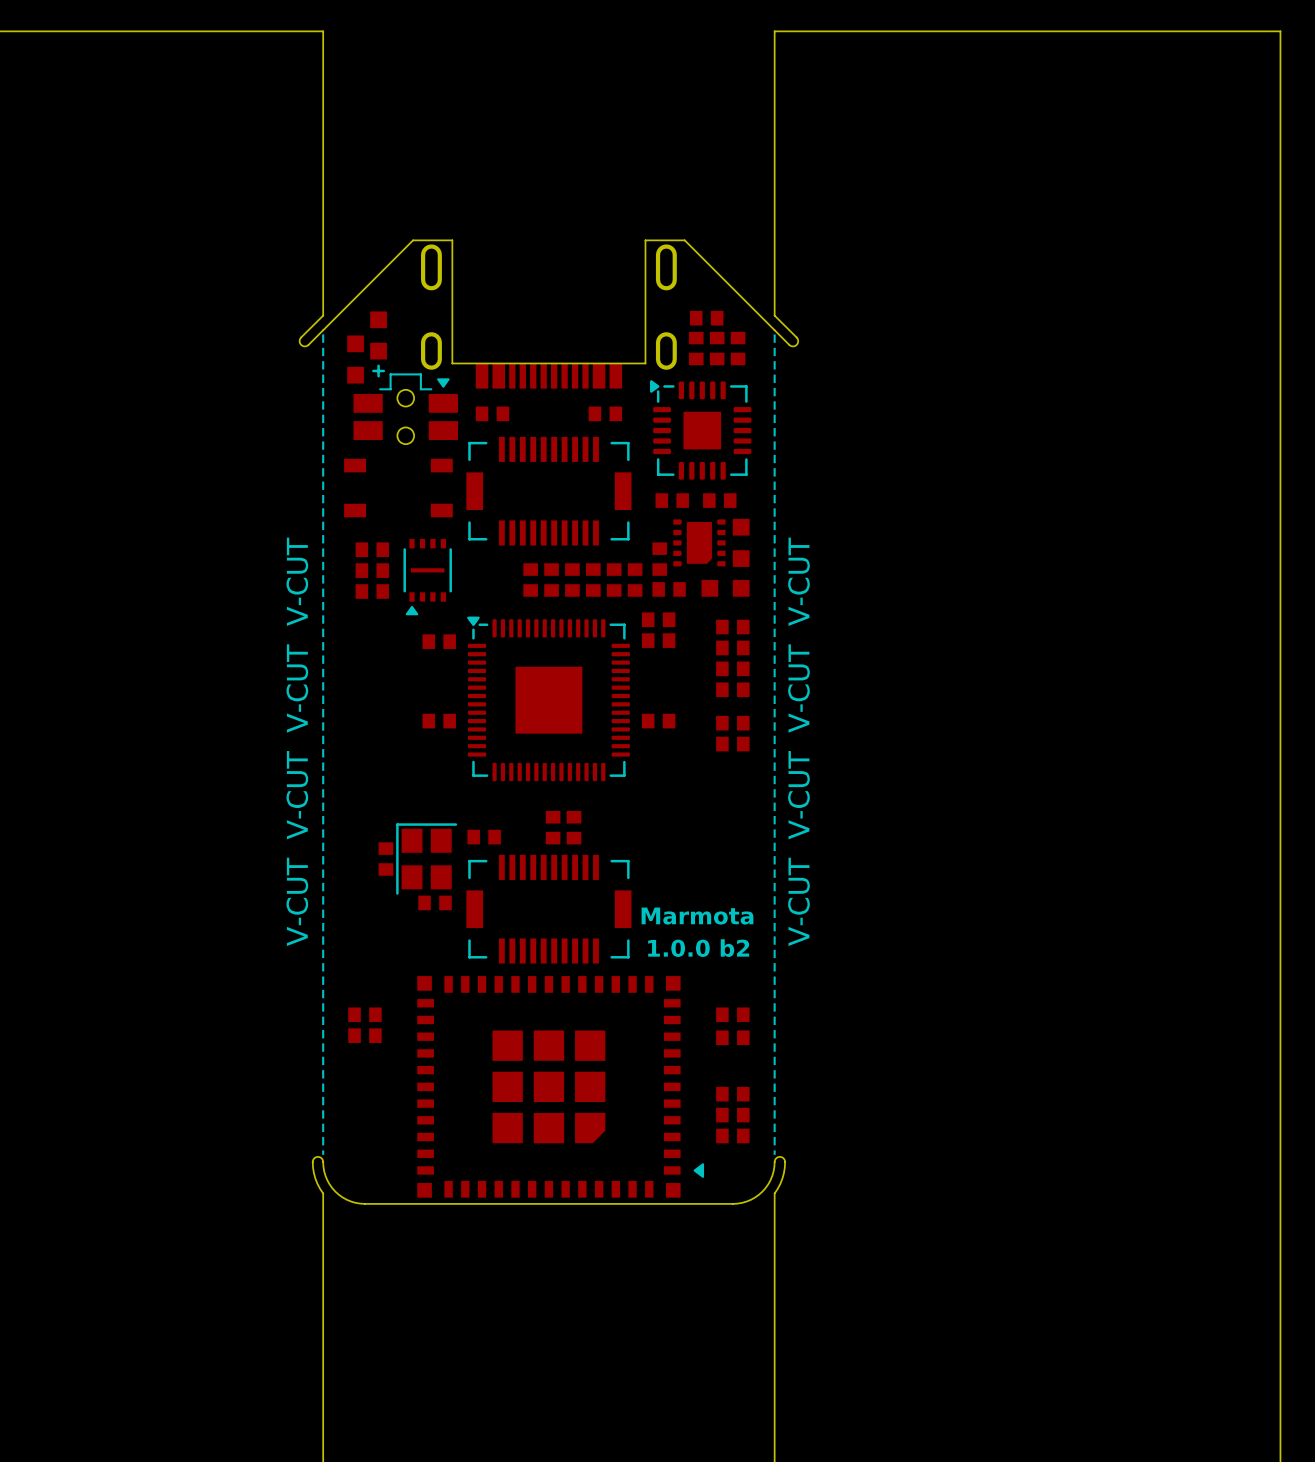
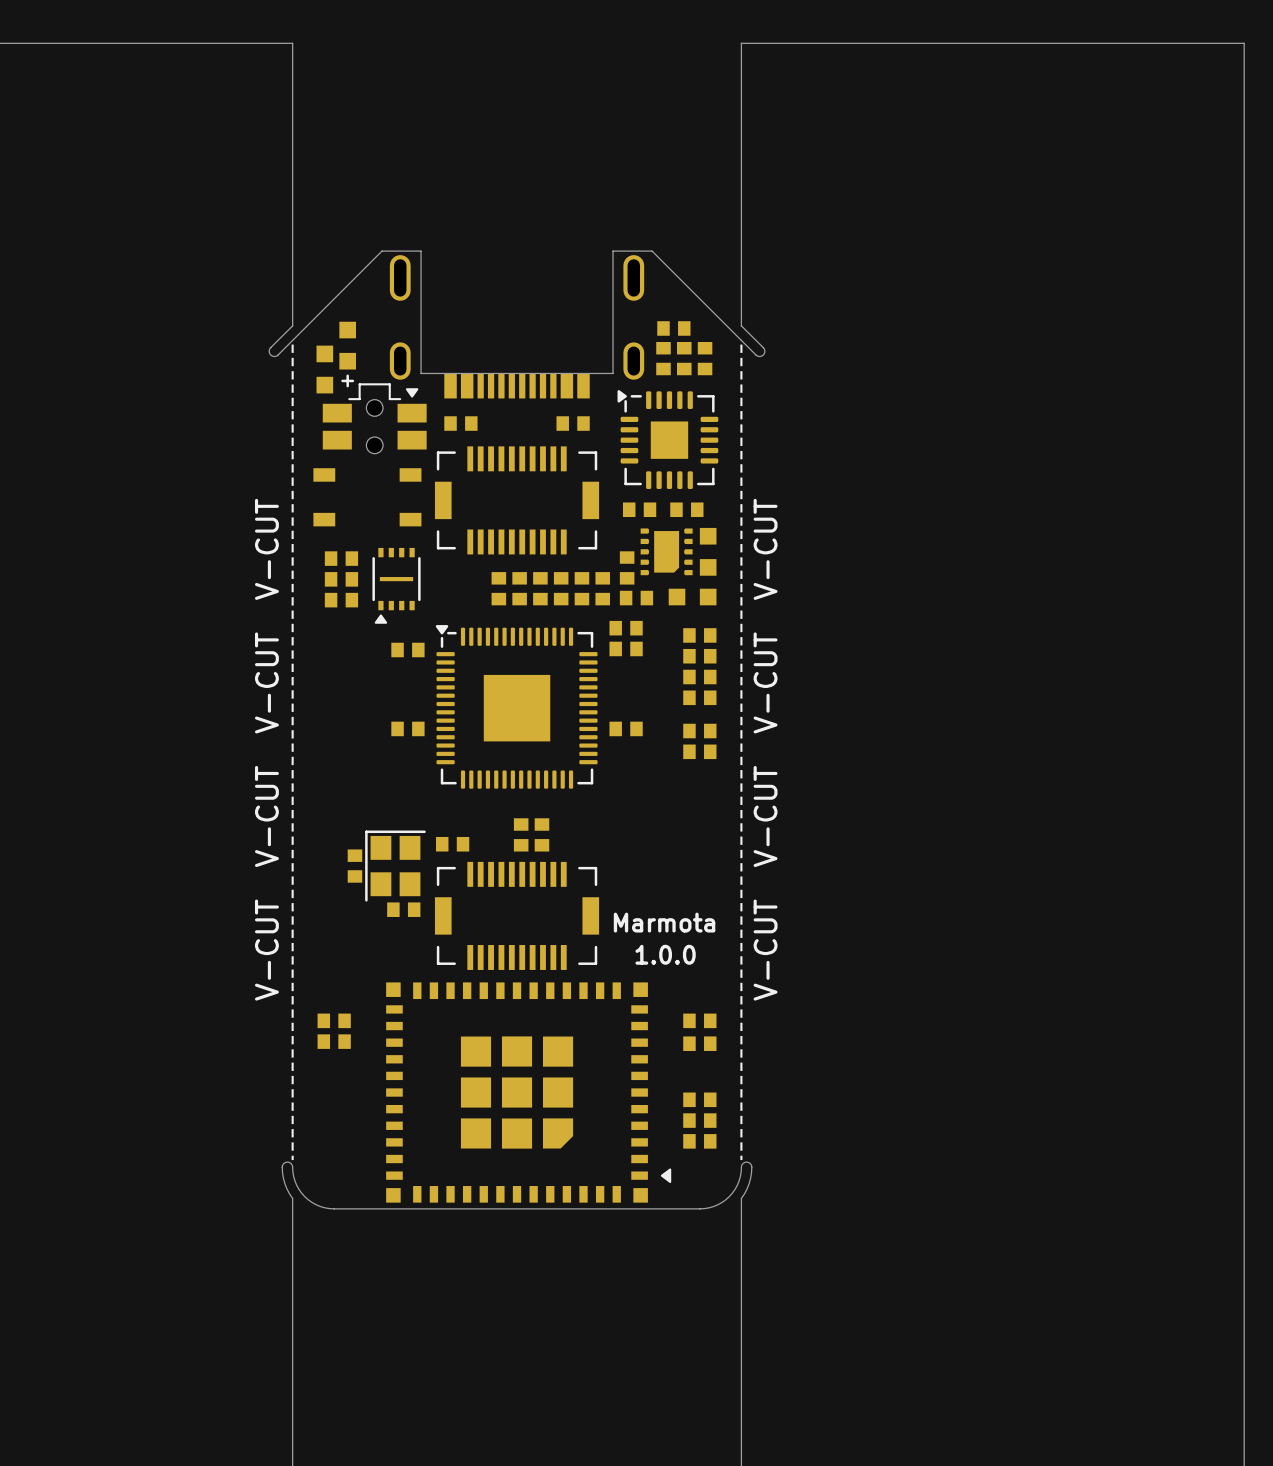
text: 1.0.0 b2 (698, 948) -> 1.0.0 (665, 954)

